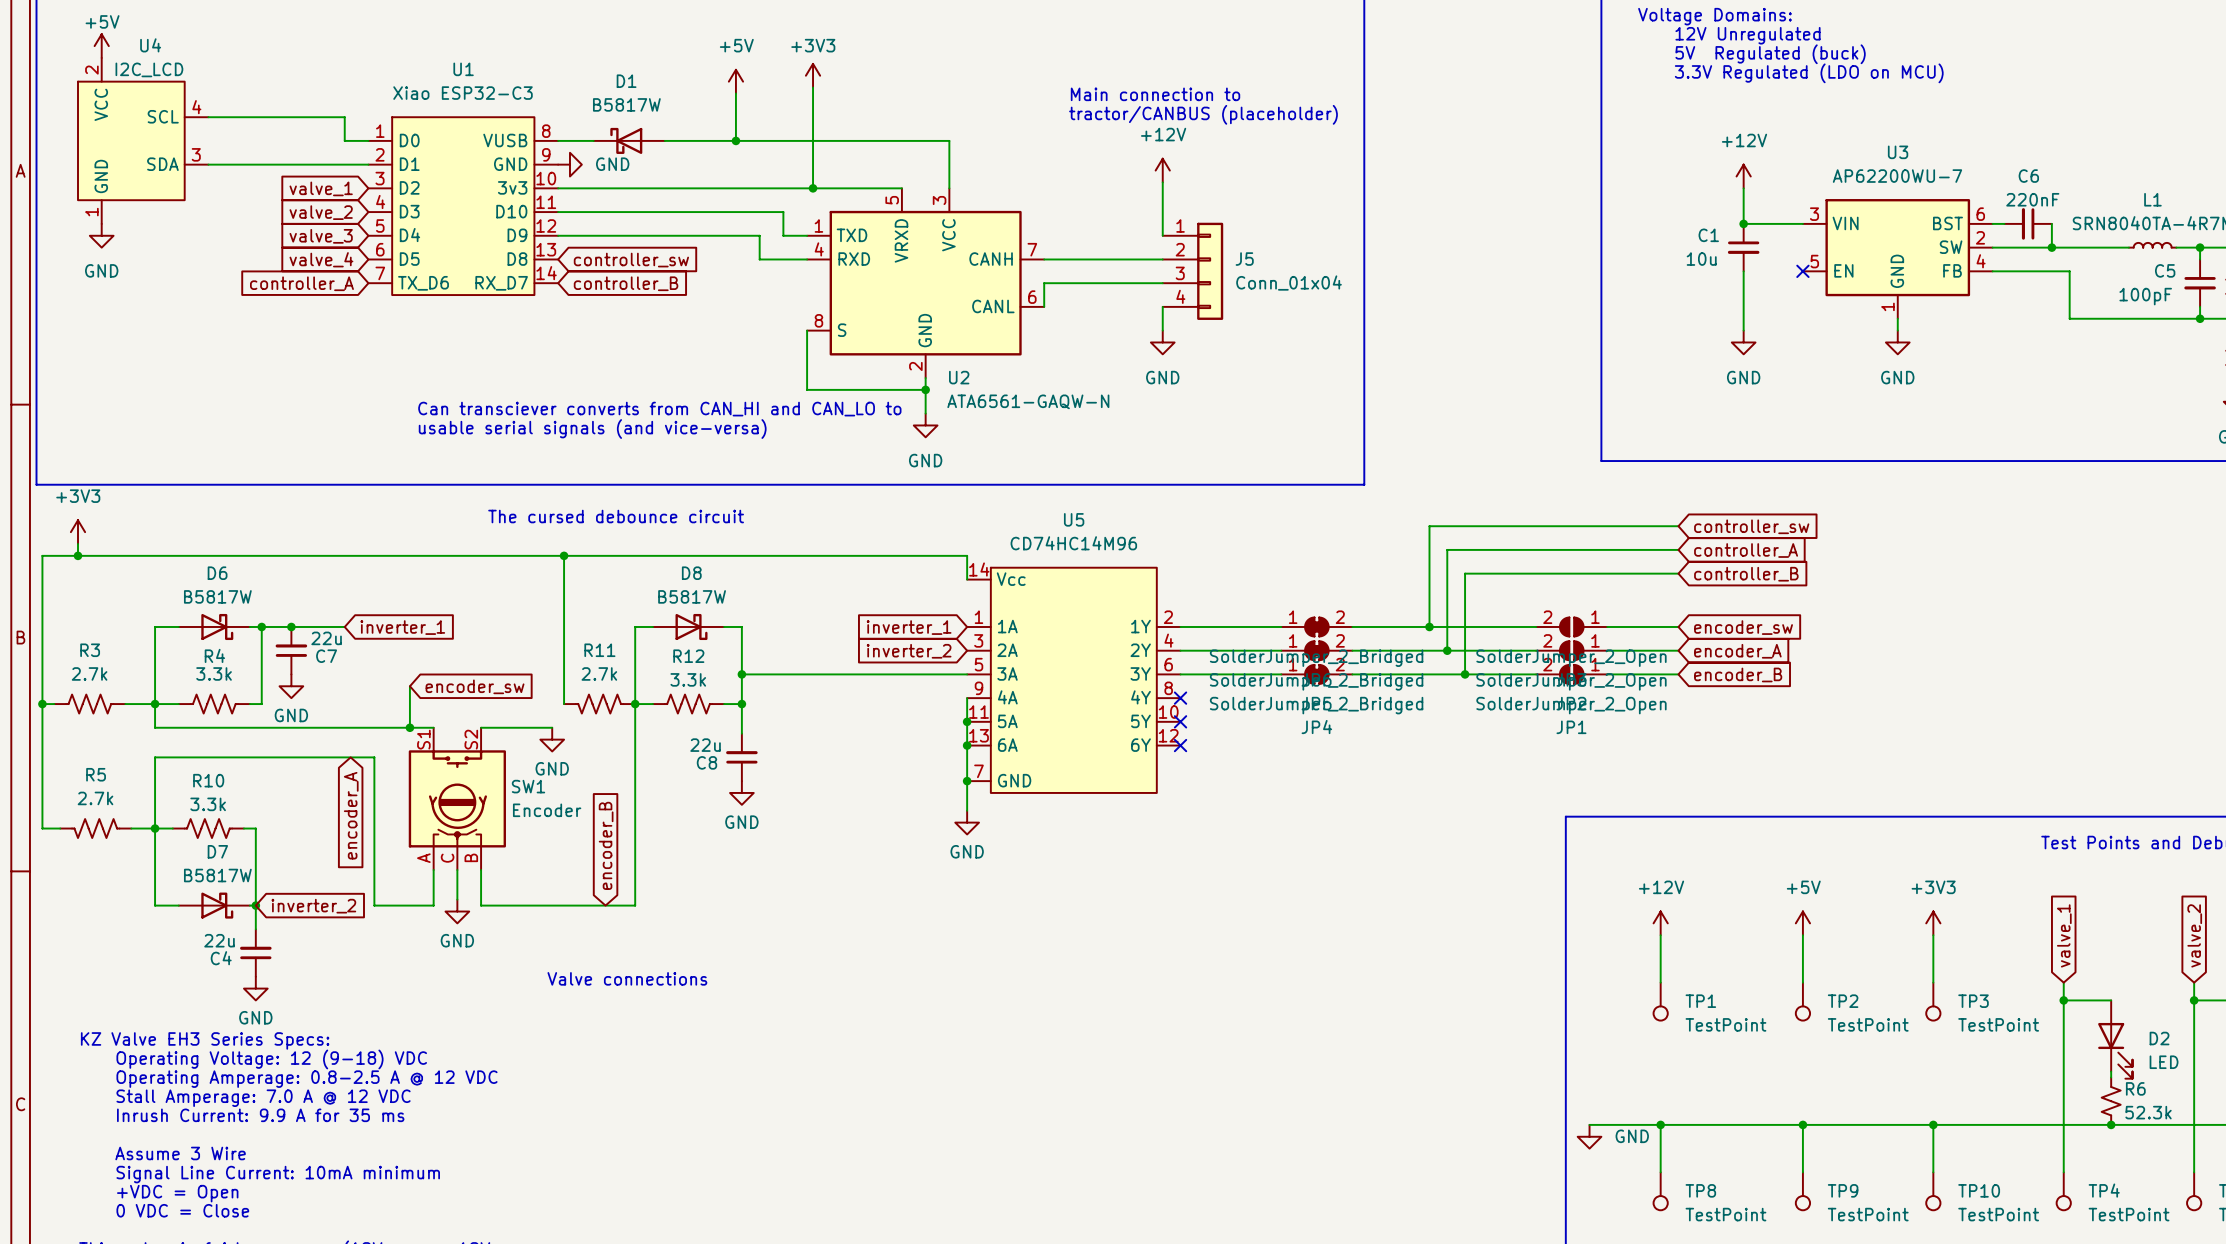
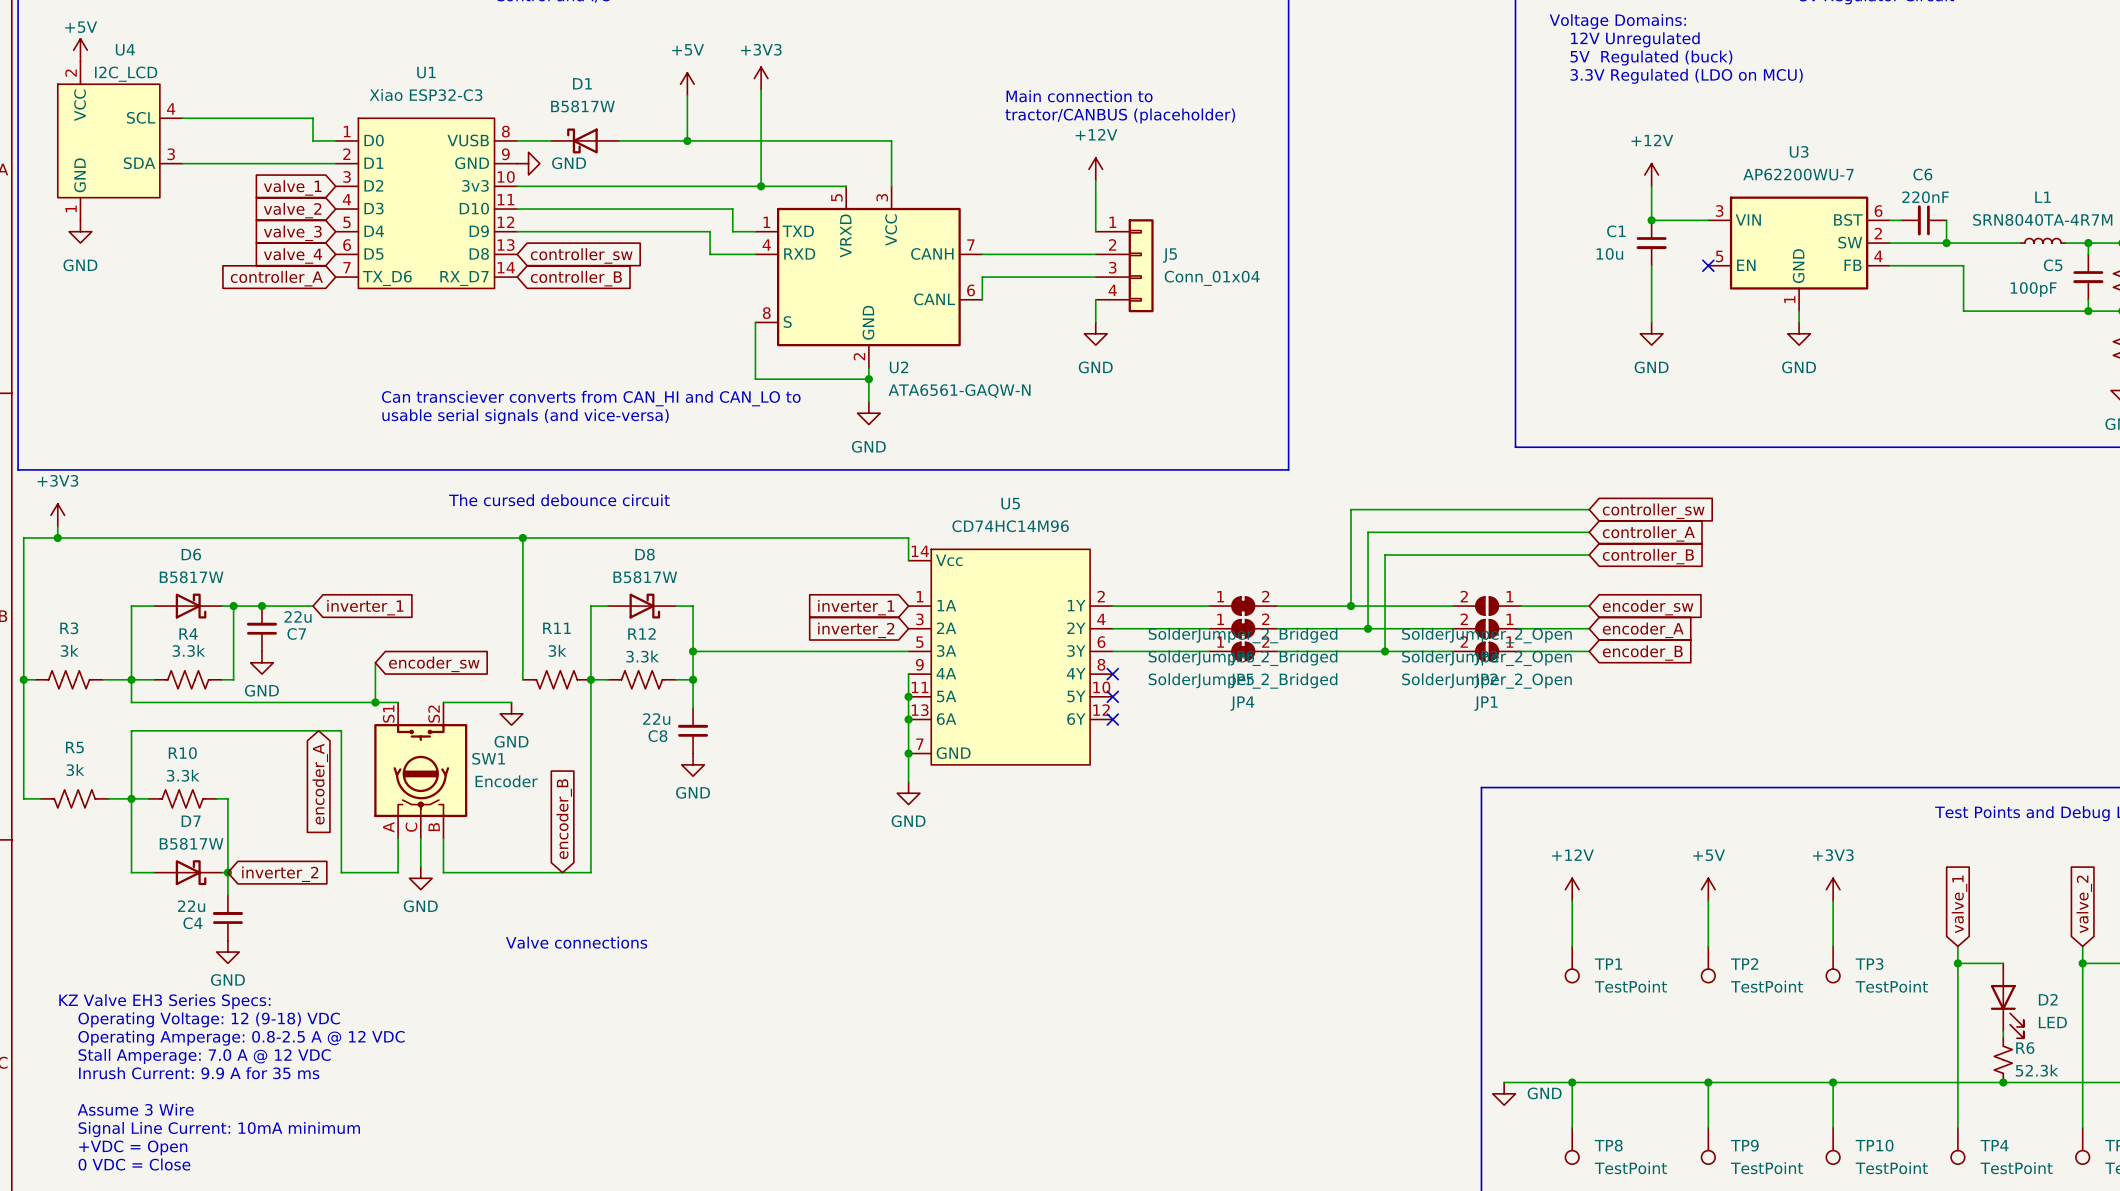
R3 value: 2.7k (89, 673) -> 3k (69, 650)
R11 value: 2.7k (599, 673) -> 3k (557, 650)
R5 value: 2.7k (95, 798) -> 3k (75, 769)

